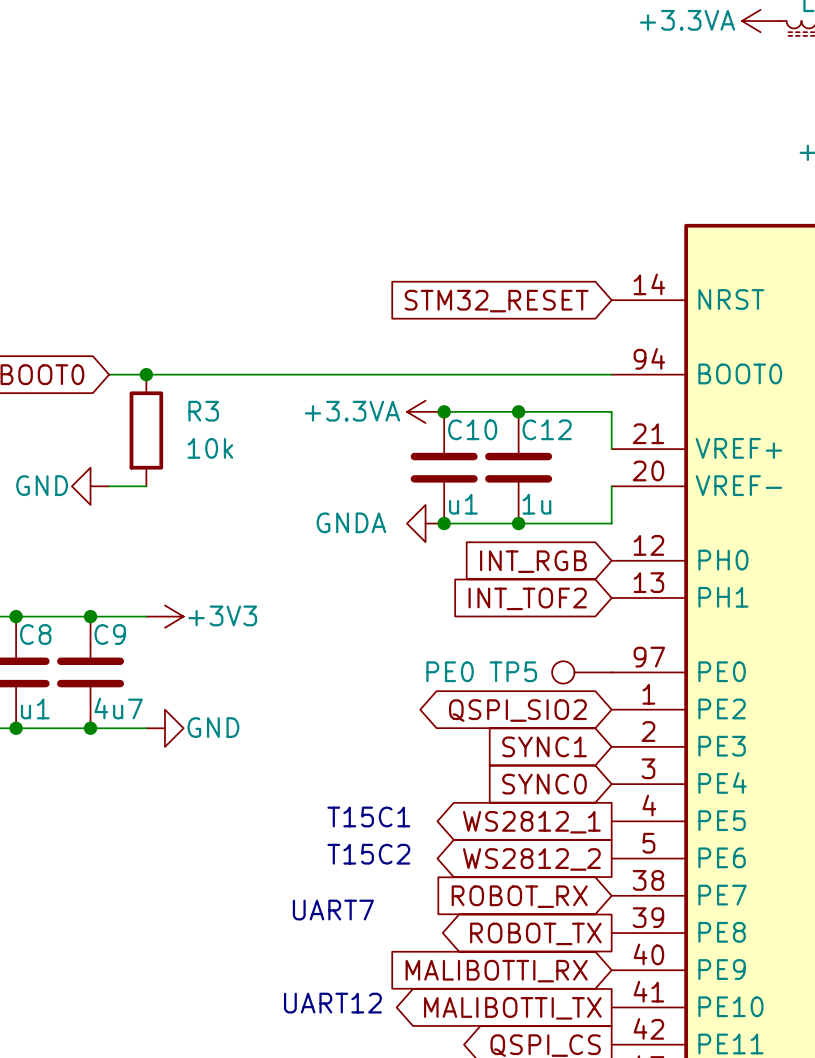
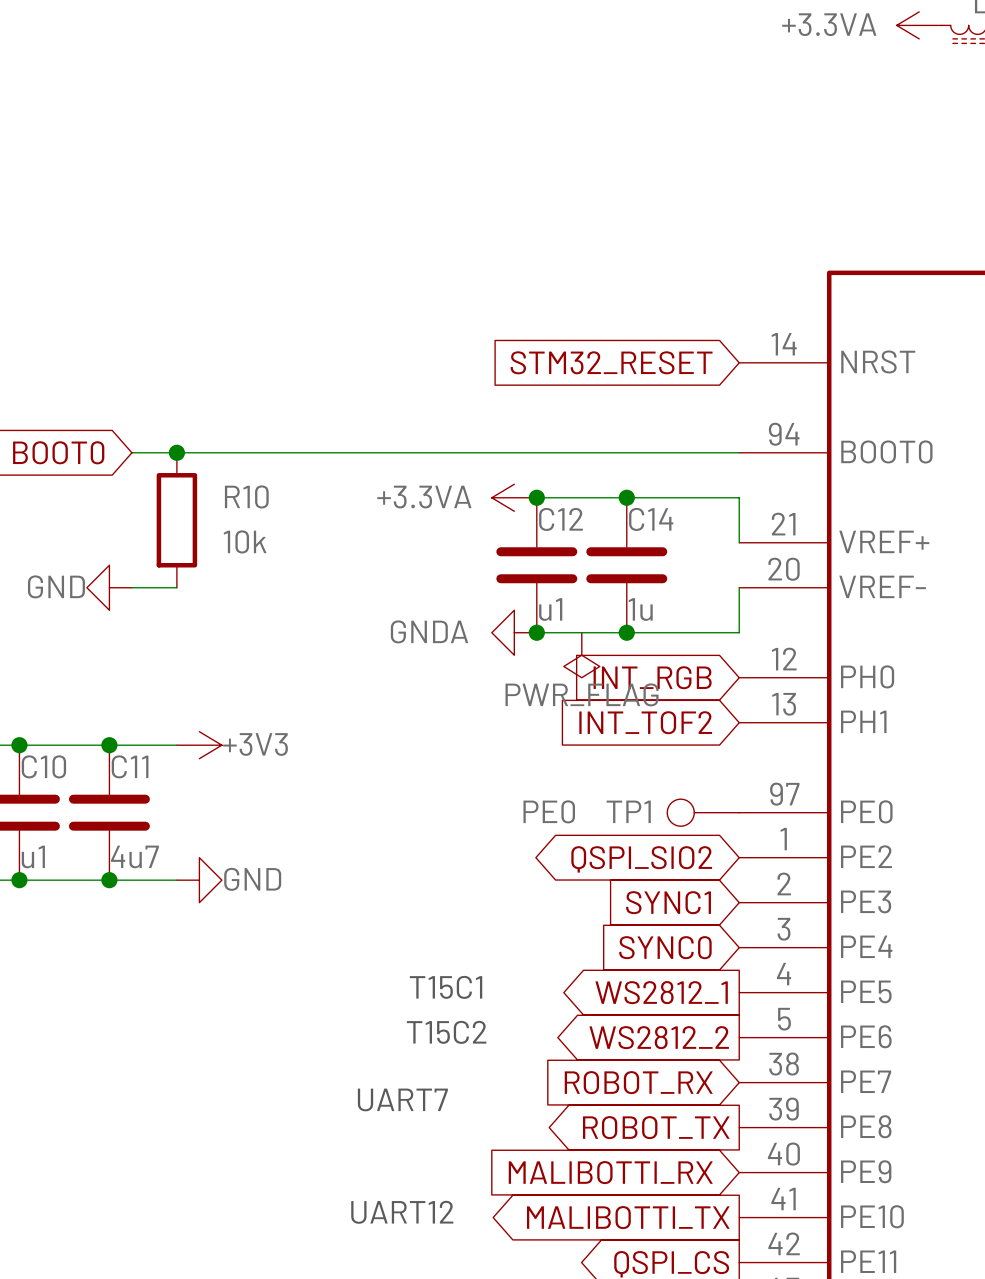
R3 name: R3 (203, 411) -> R10 (246, 496)
C10 name: C10 (472, 429) -> C12 (561, 519)
C12 name: C12 (547, 429) -> C14 (651, 519)
power symbol: none -> PWR_FLAG (581, 655)
C8 name: C8 (35, 634) -> C10 (43, 766)
C9 name: C9 (110, 634) -> C11 (130, 766)
TP5 name: TP5 (513, 671) -> TP1 (628, 811)

